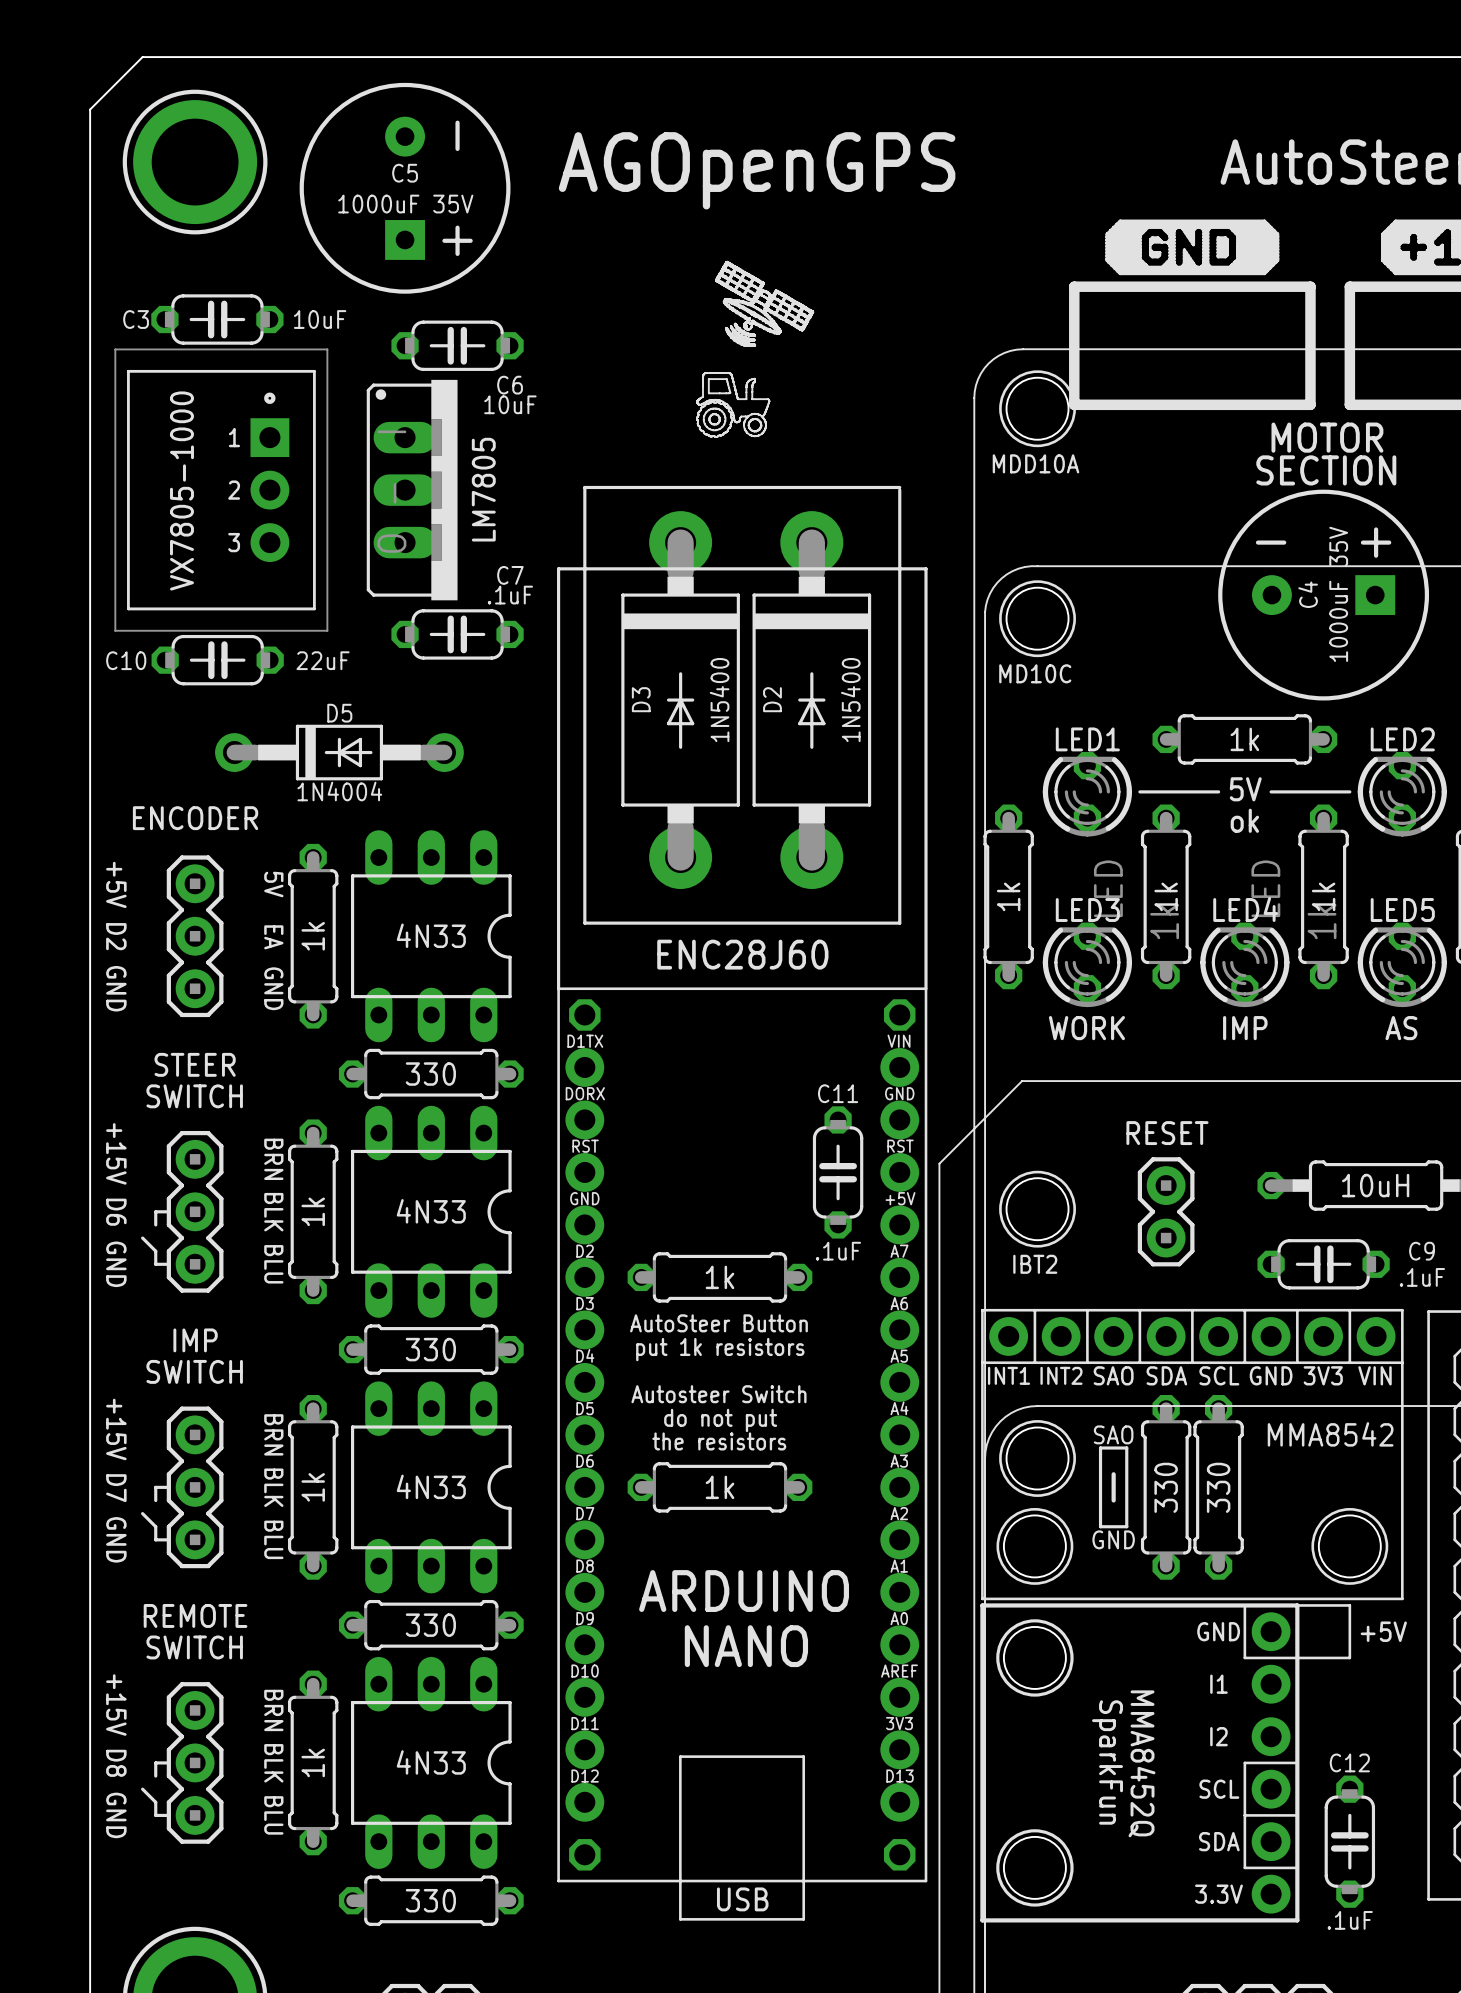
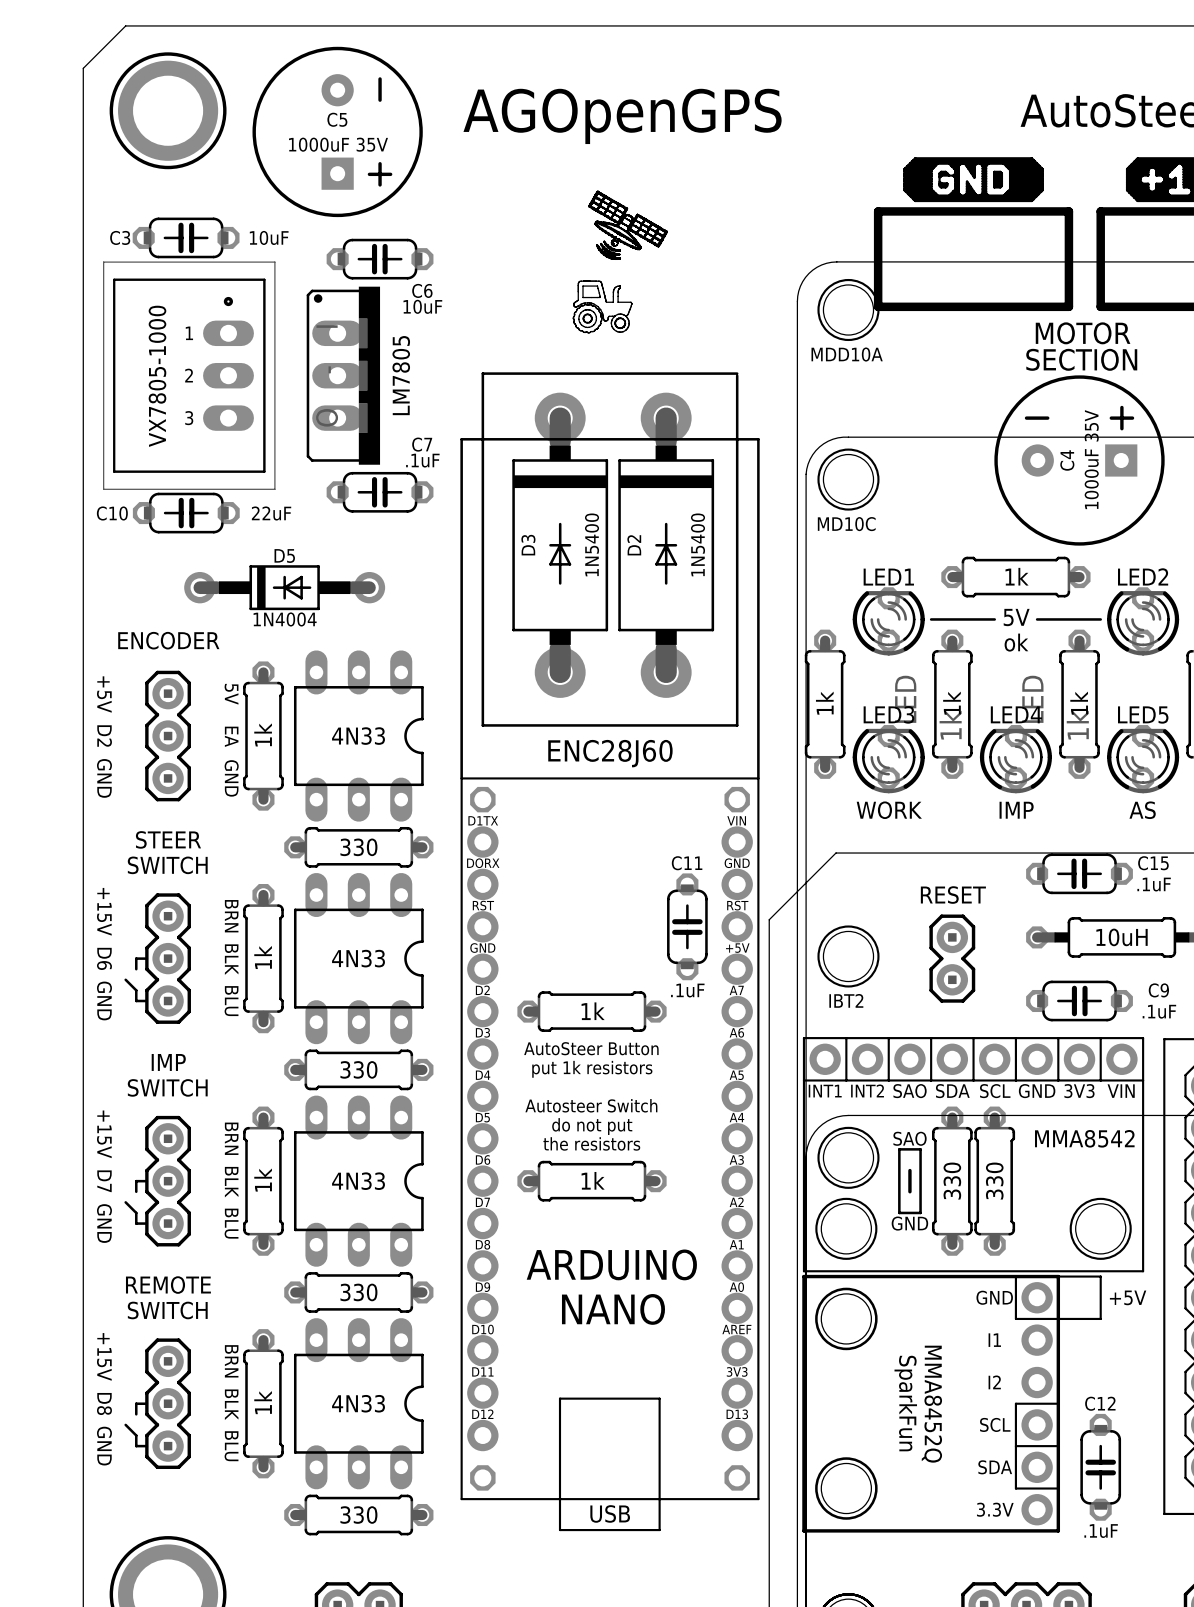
part footprint: [114, 348, 329, 632] -> [103, 261, 276, 490]
C15: none -> .1uF (1079, 873)

